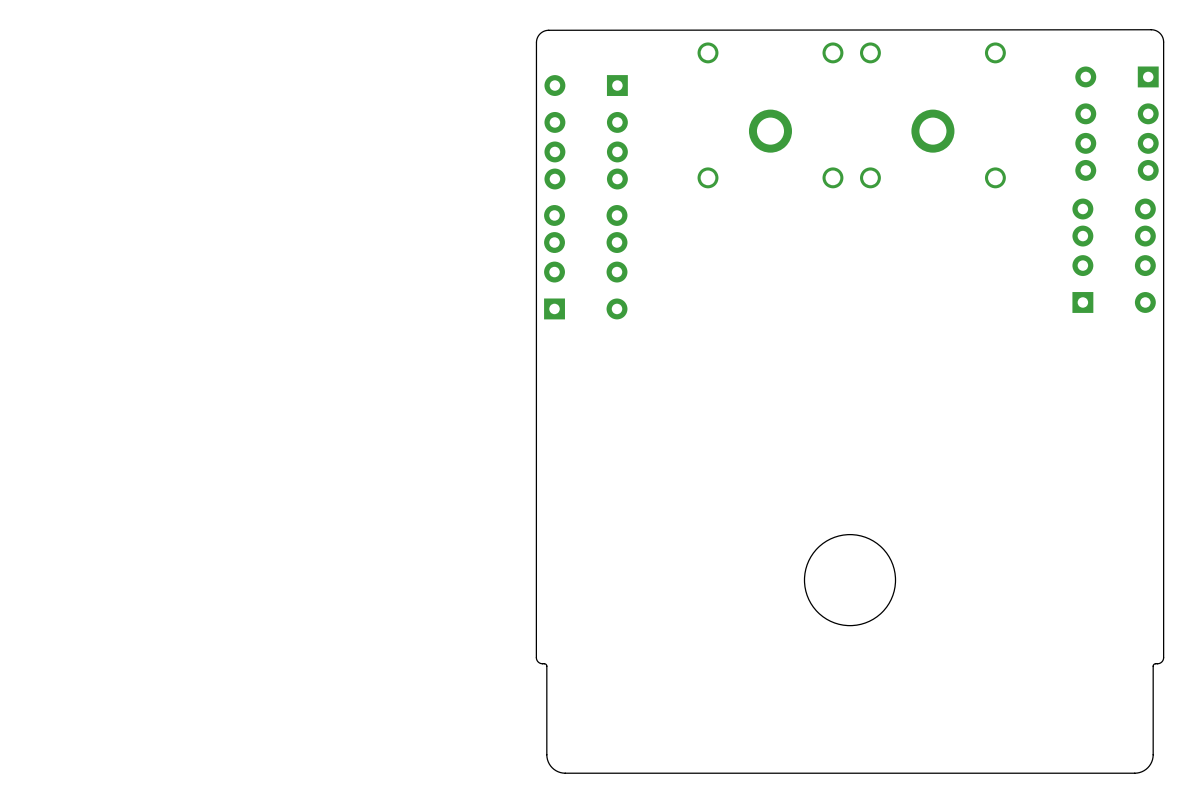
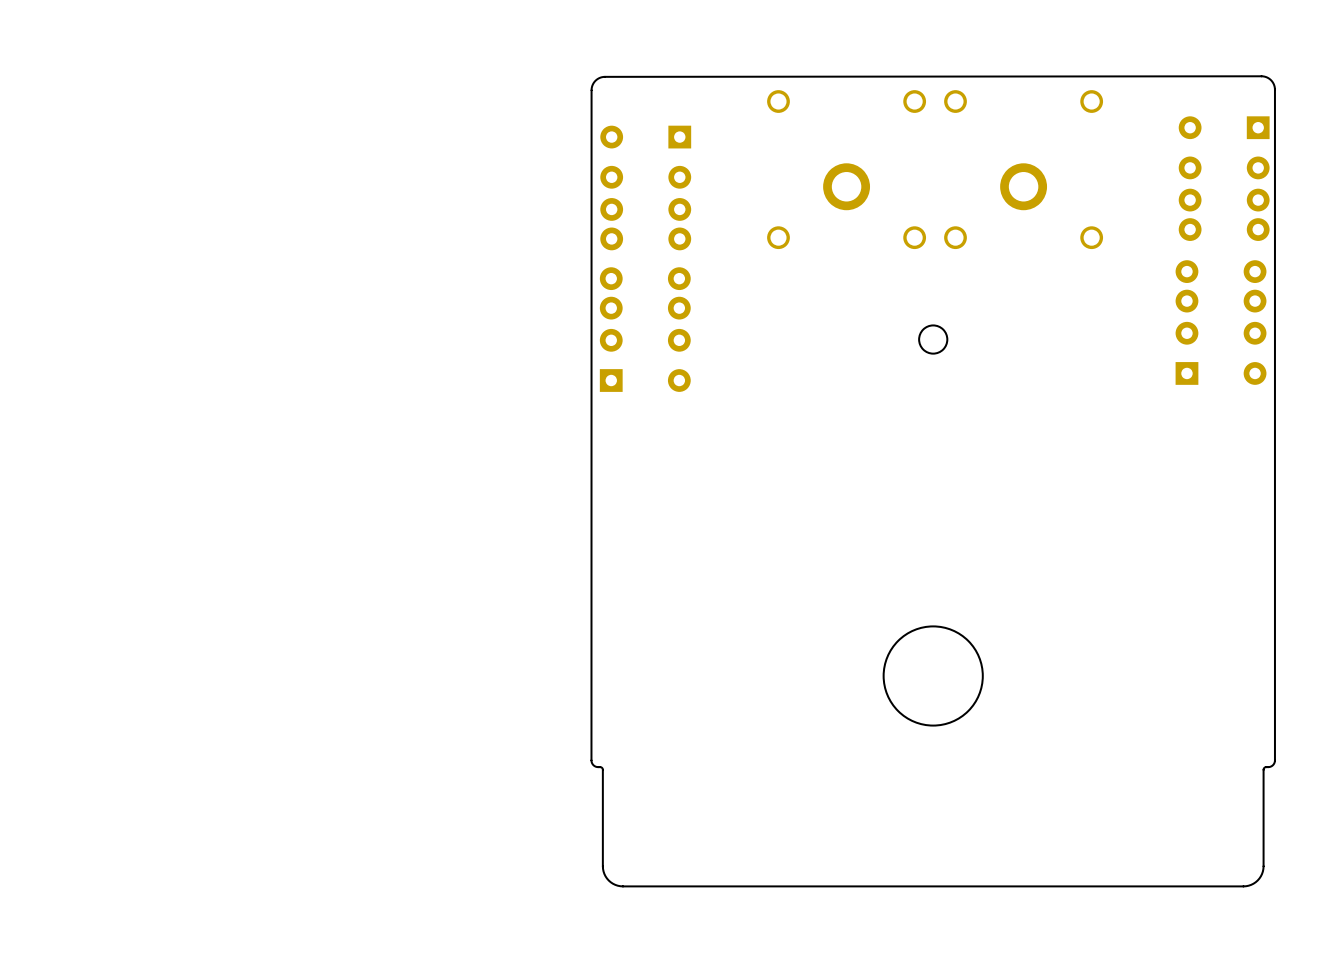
round board edge: none -> [918, 325, 948, 354]

